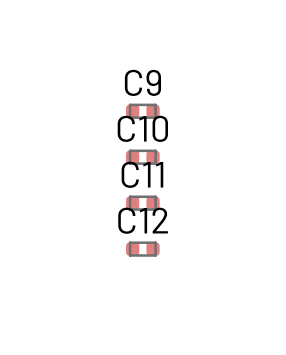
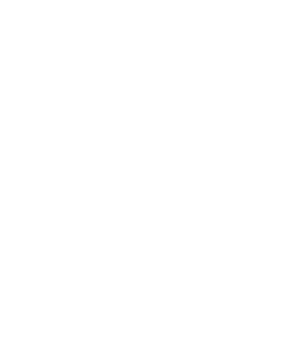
C9: (142, 111) -> none
C10: (142, 157) -> none
C11: (142, 203) -> none
C12: (142, 249) -> none

